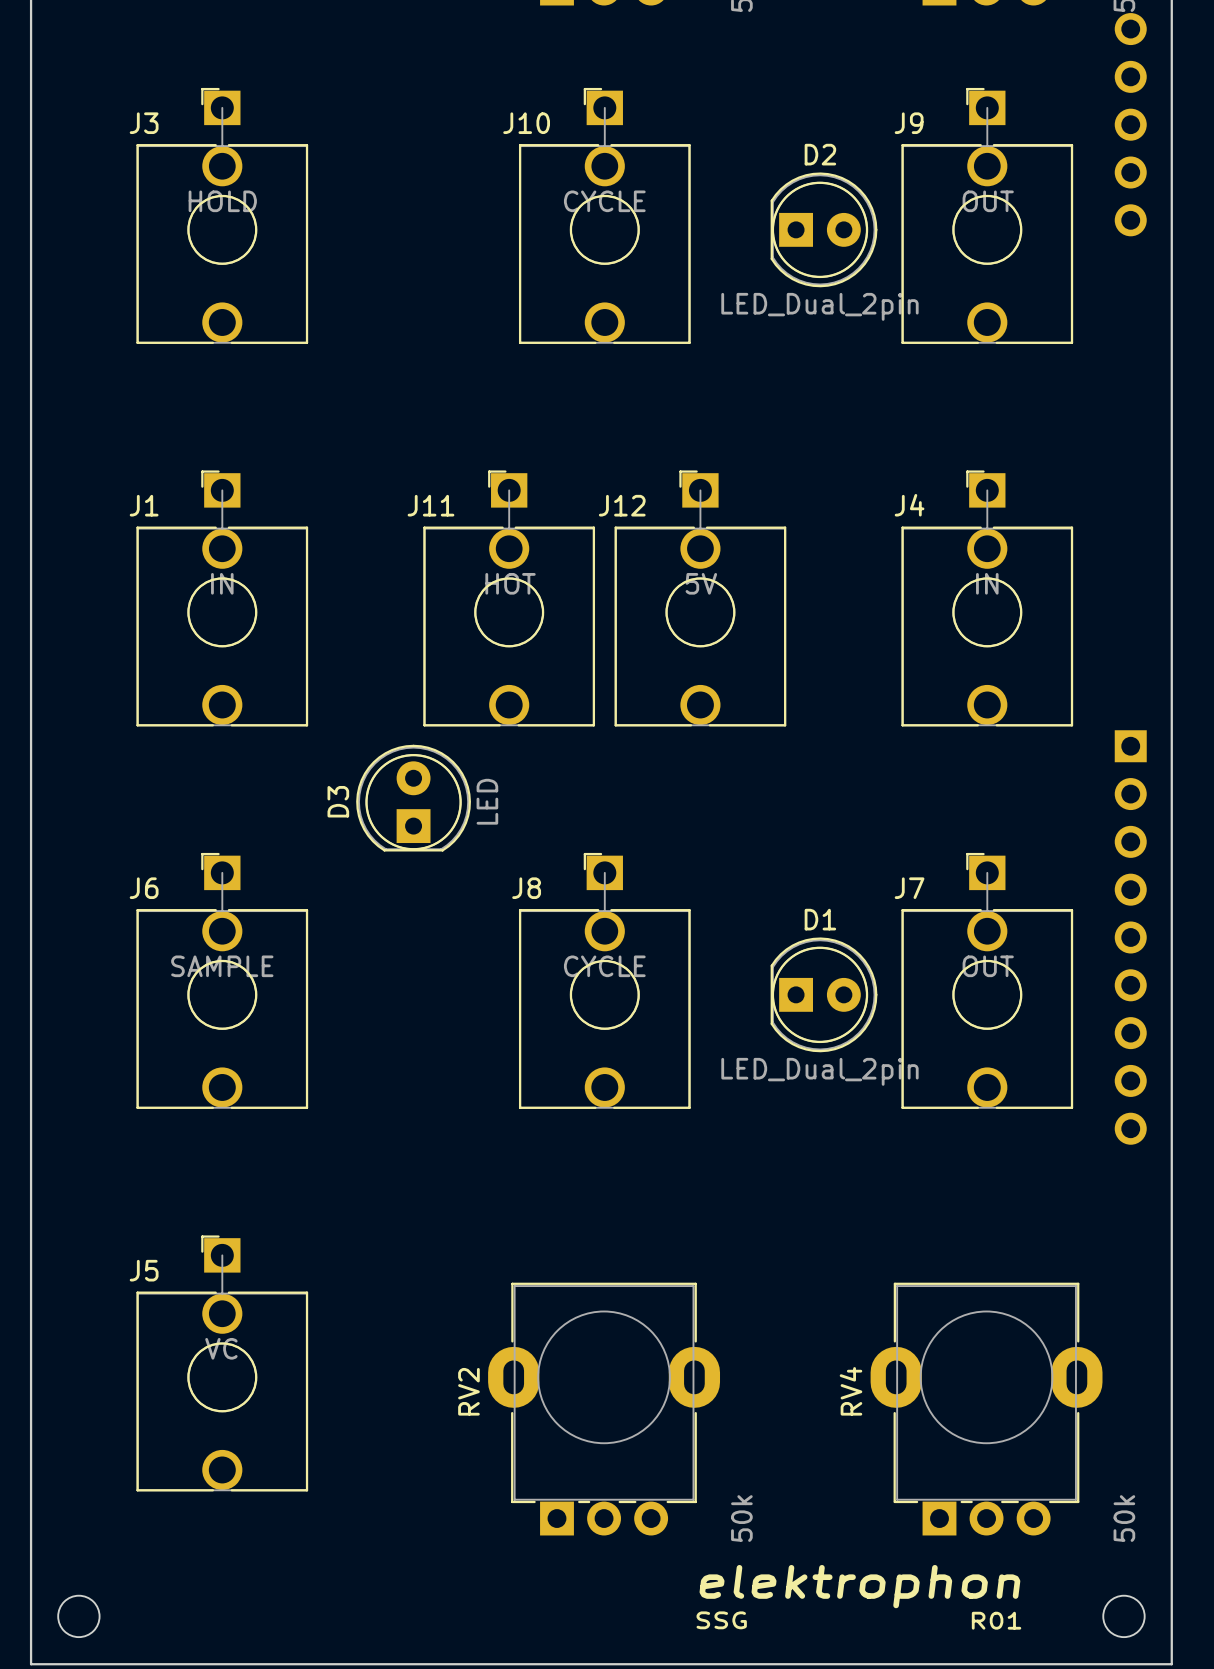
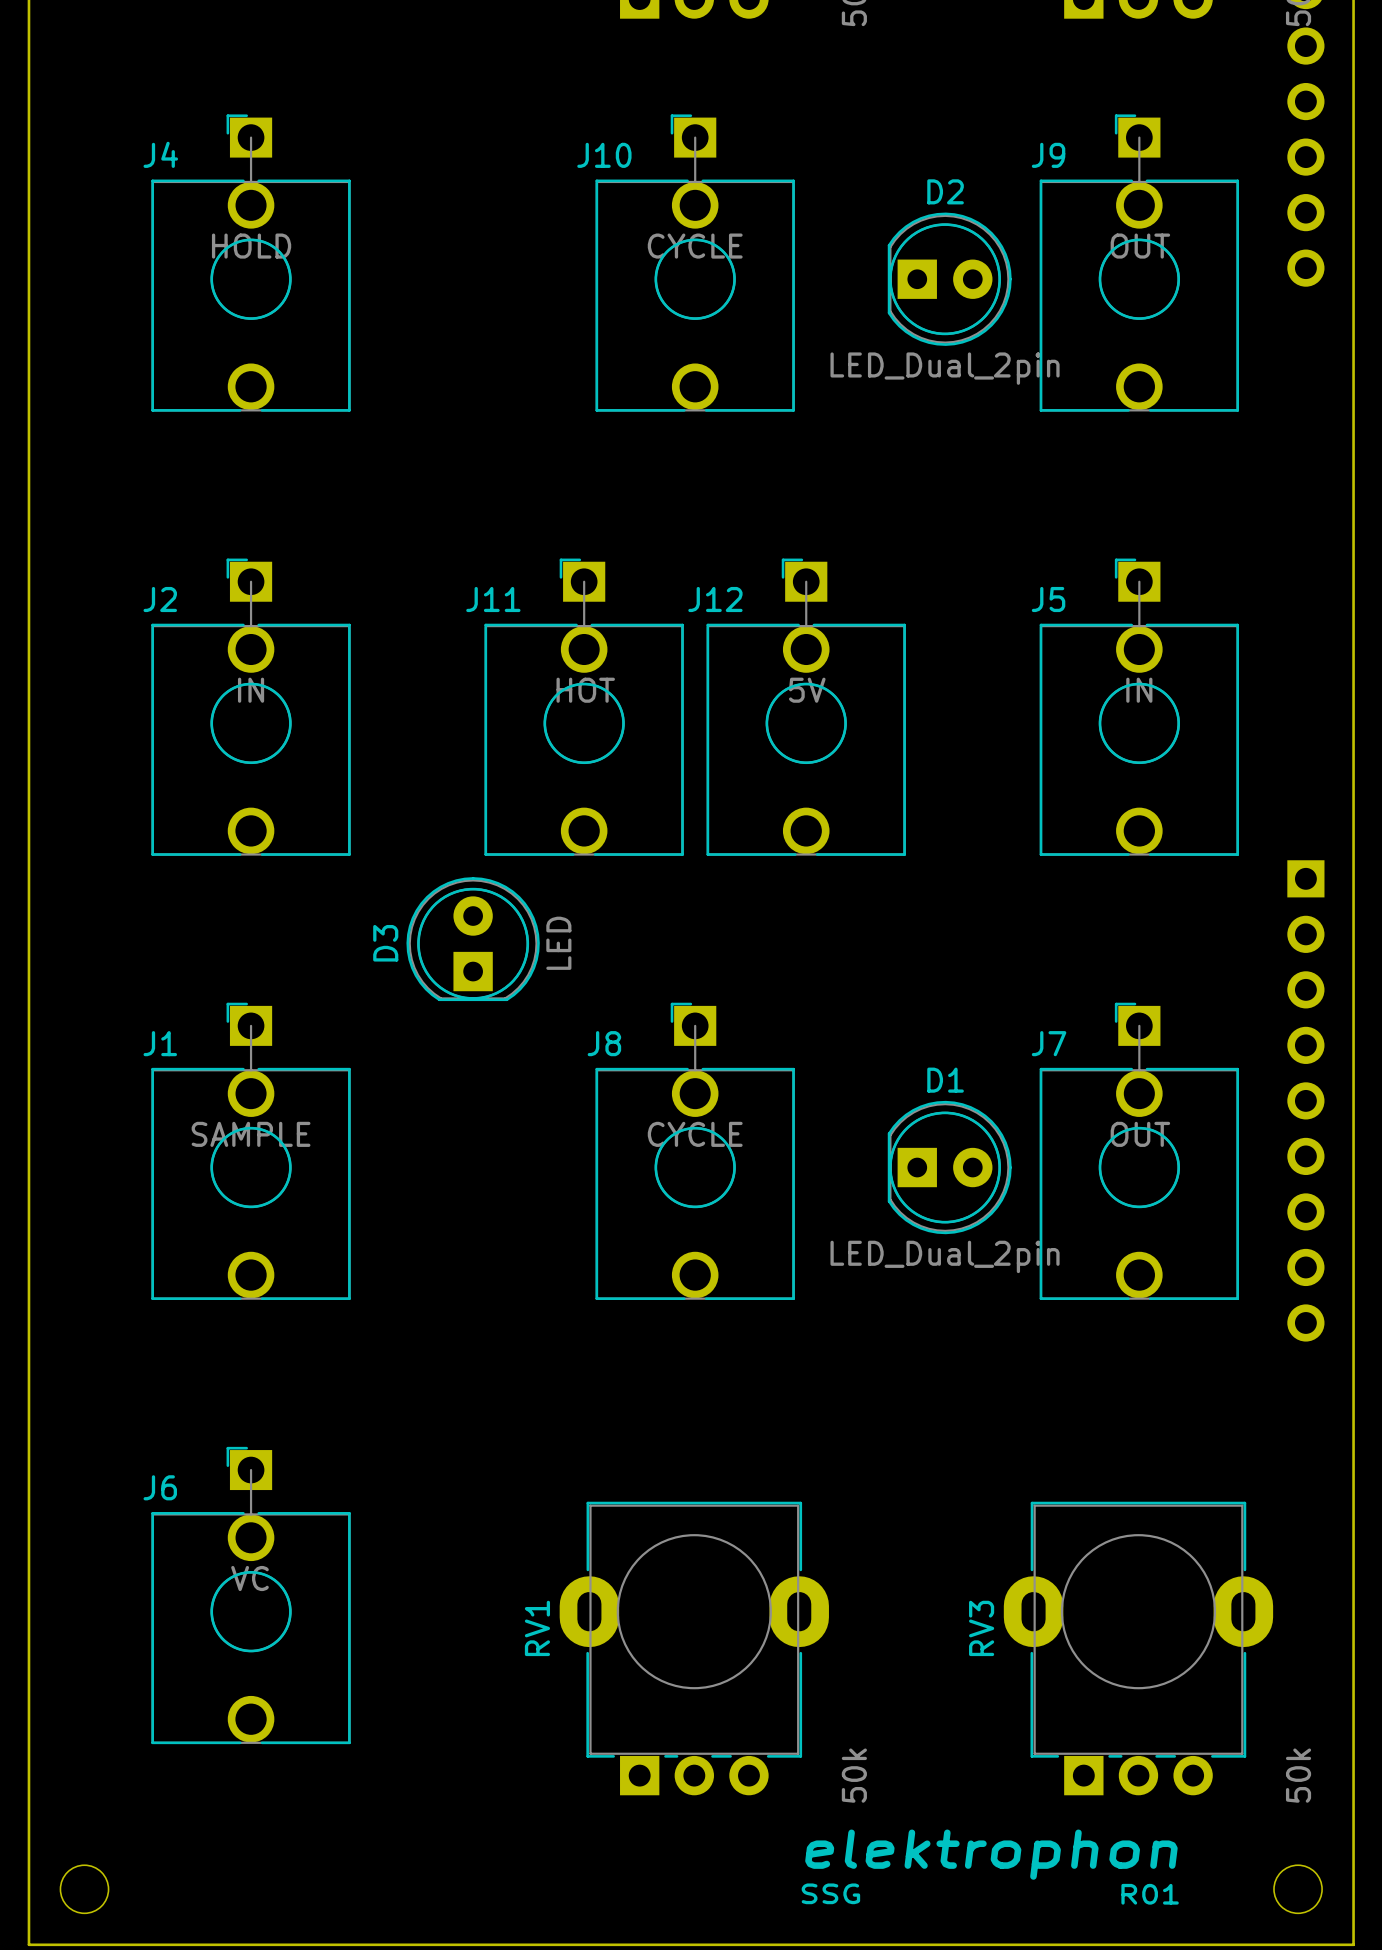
J3 name: J3 (144, 123) -> J4 (160, 154)
J1 name: J1 (144, 505) -> J2 (160, 599)
J4 name: J4 (909, 505) -> J5 (1048, 599)
J6 name: J6 (144, 888) -> J1 (160, 1043)
J5 name: J5 (144, 1270) -> J6 (160, 1487)
RV2 name: RV2 (468, 1391) -> RV1 (537, 1628)
RV4 name: RV4 (851, 1391) -> RV3 (981, 1628)

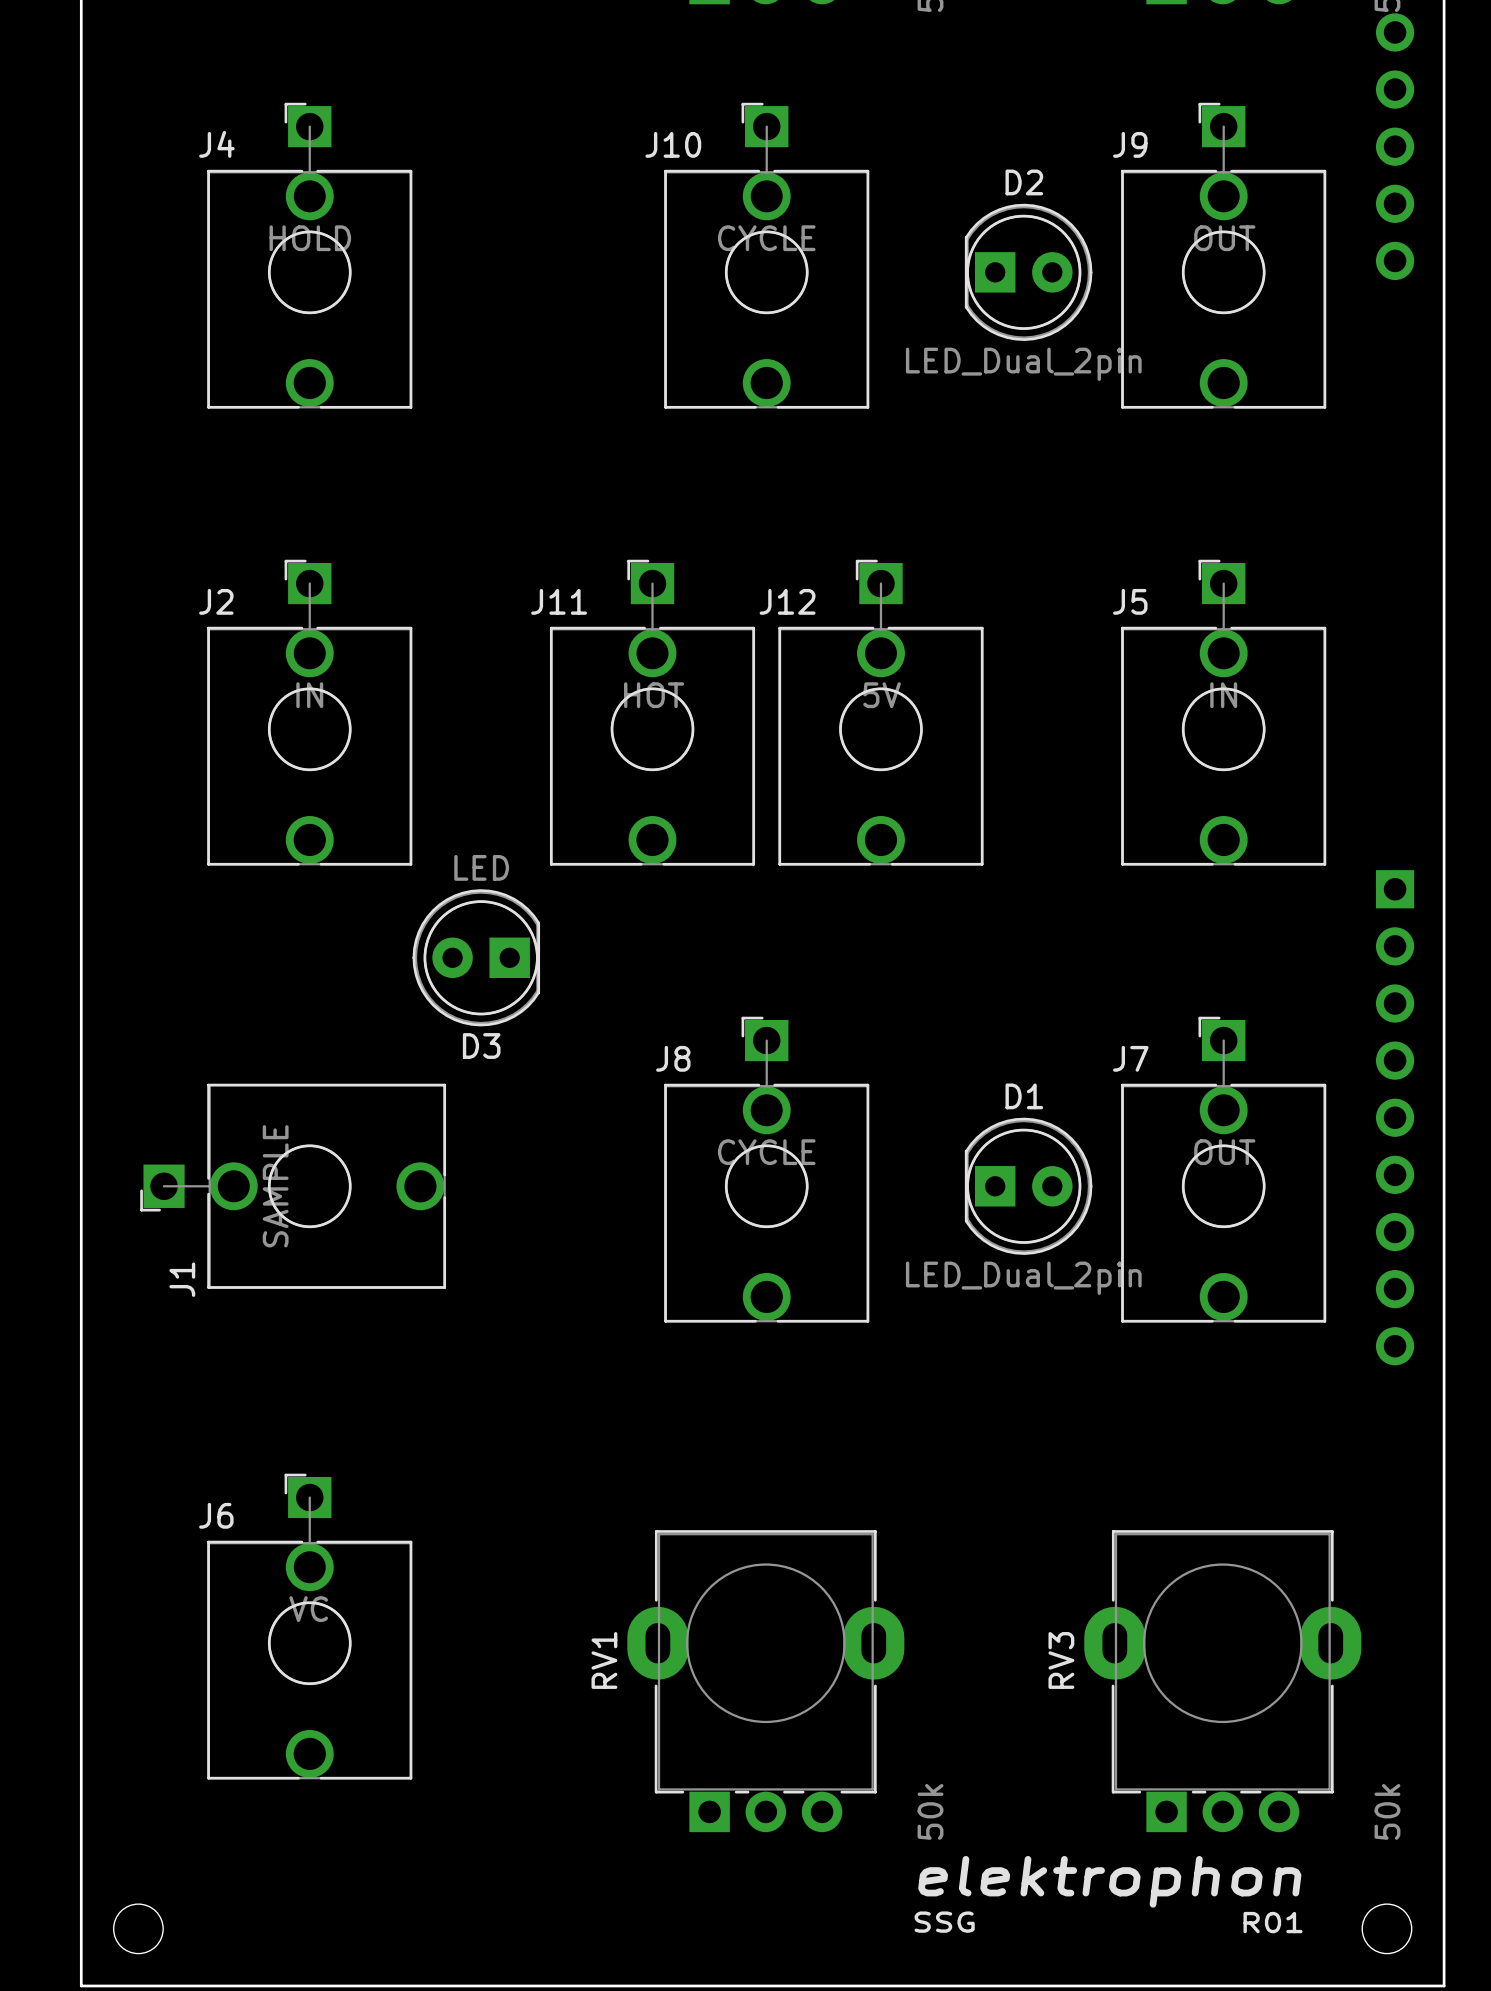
D3 rotation: 0° (473, 939) -> 90° counterclockwise (476, 957)
J1 rotation: 0° (251, 1151) -> 90° counterclockwise (293, 1186)
drawing position: (990, 1867) -> (1108, 1894)

